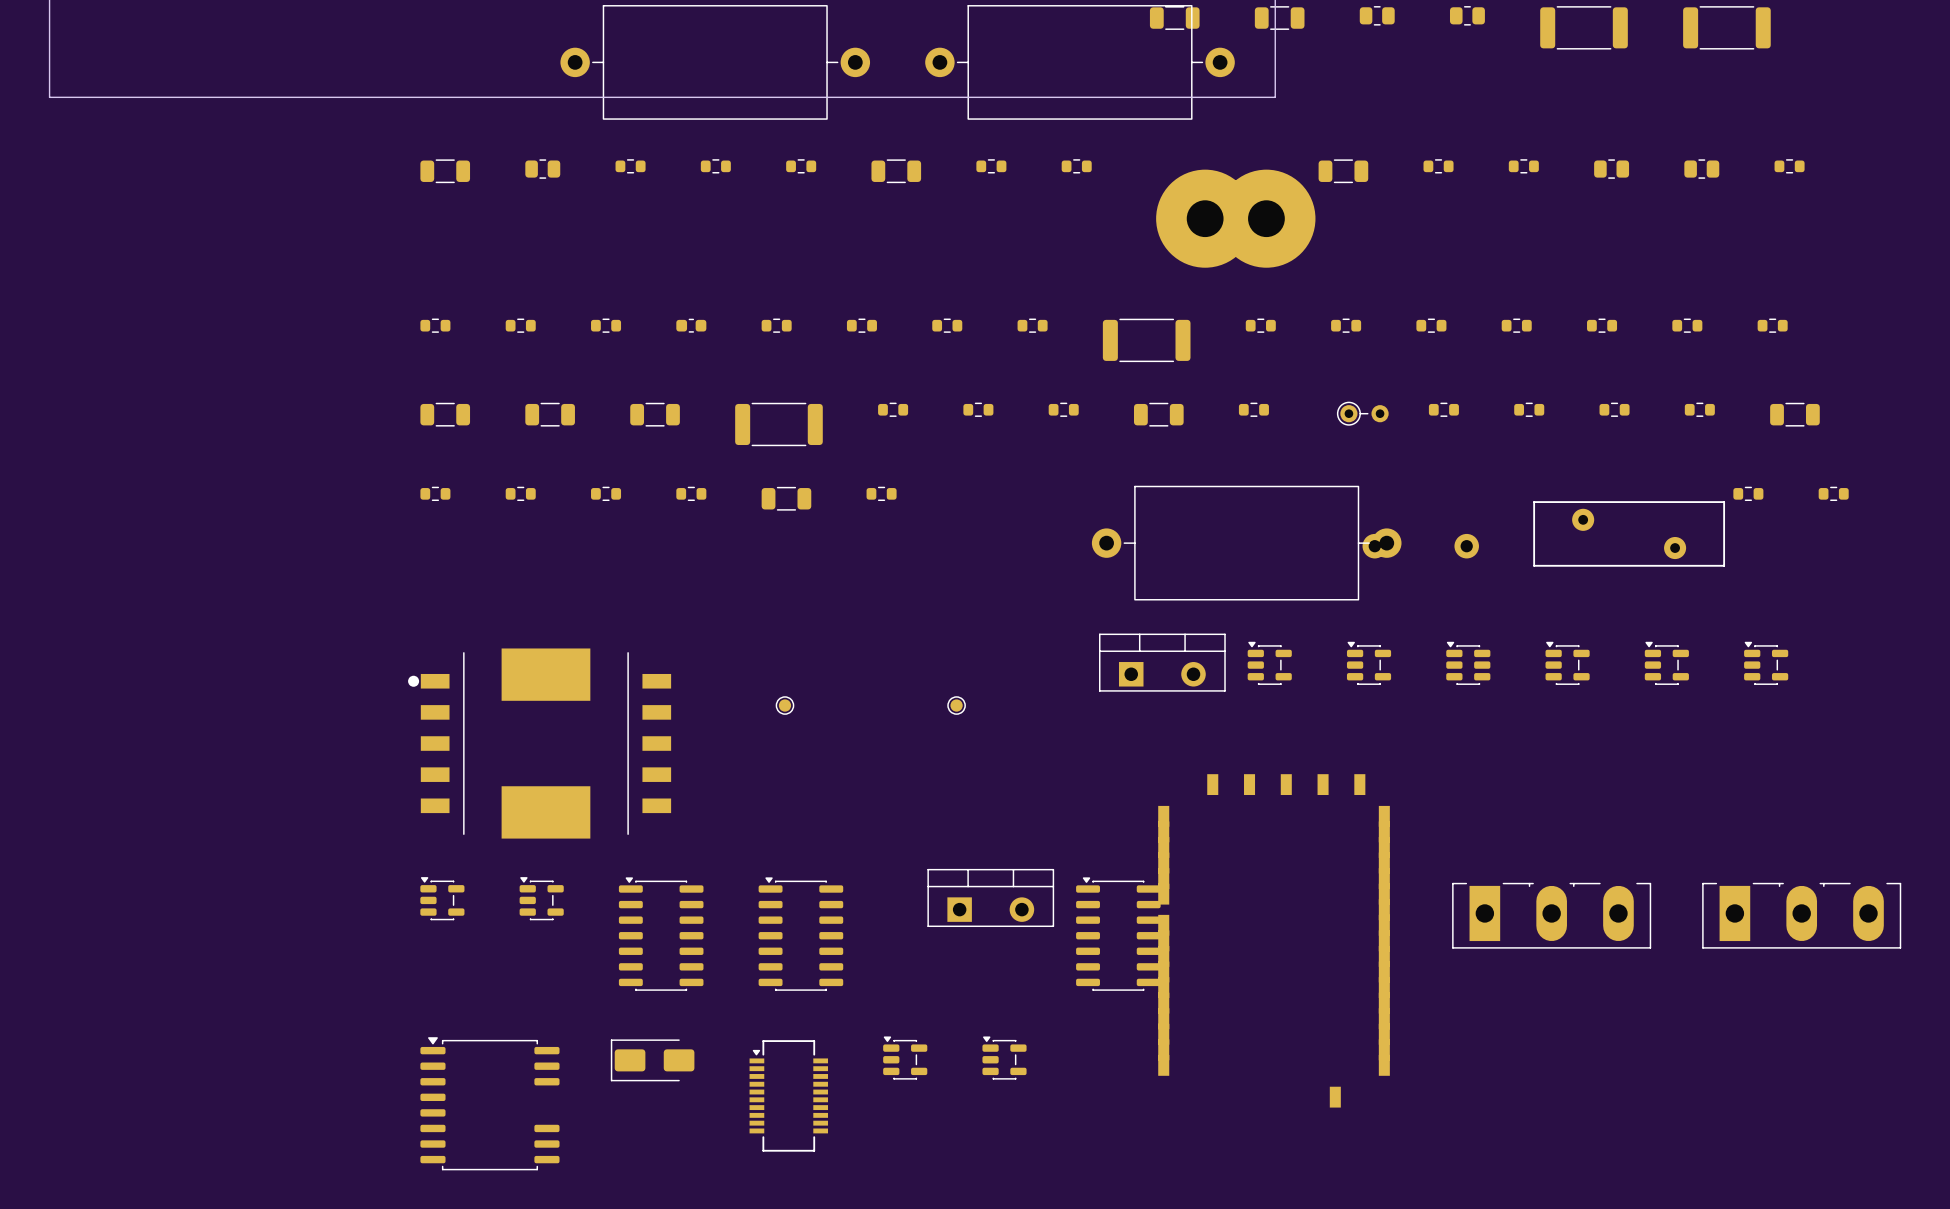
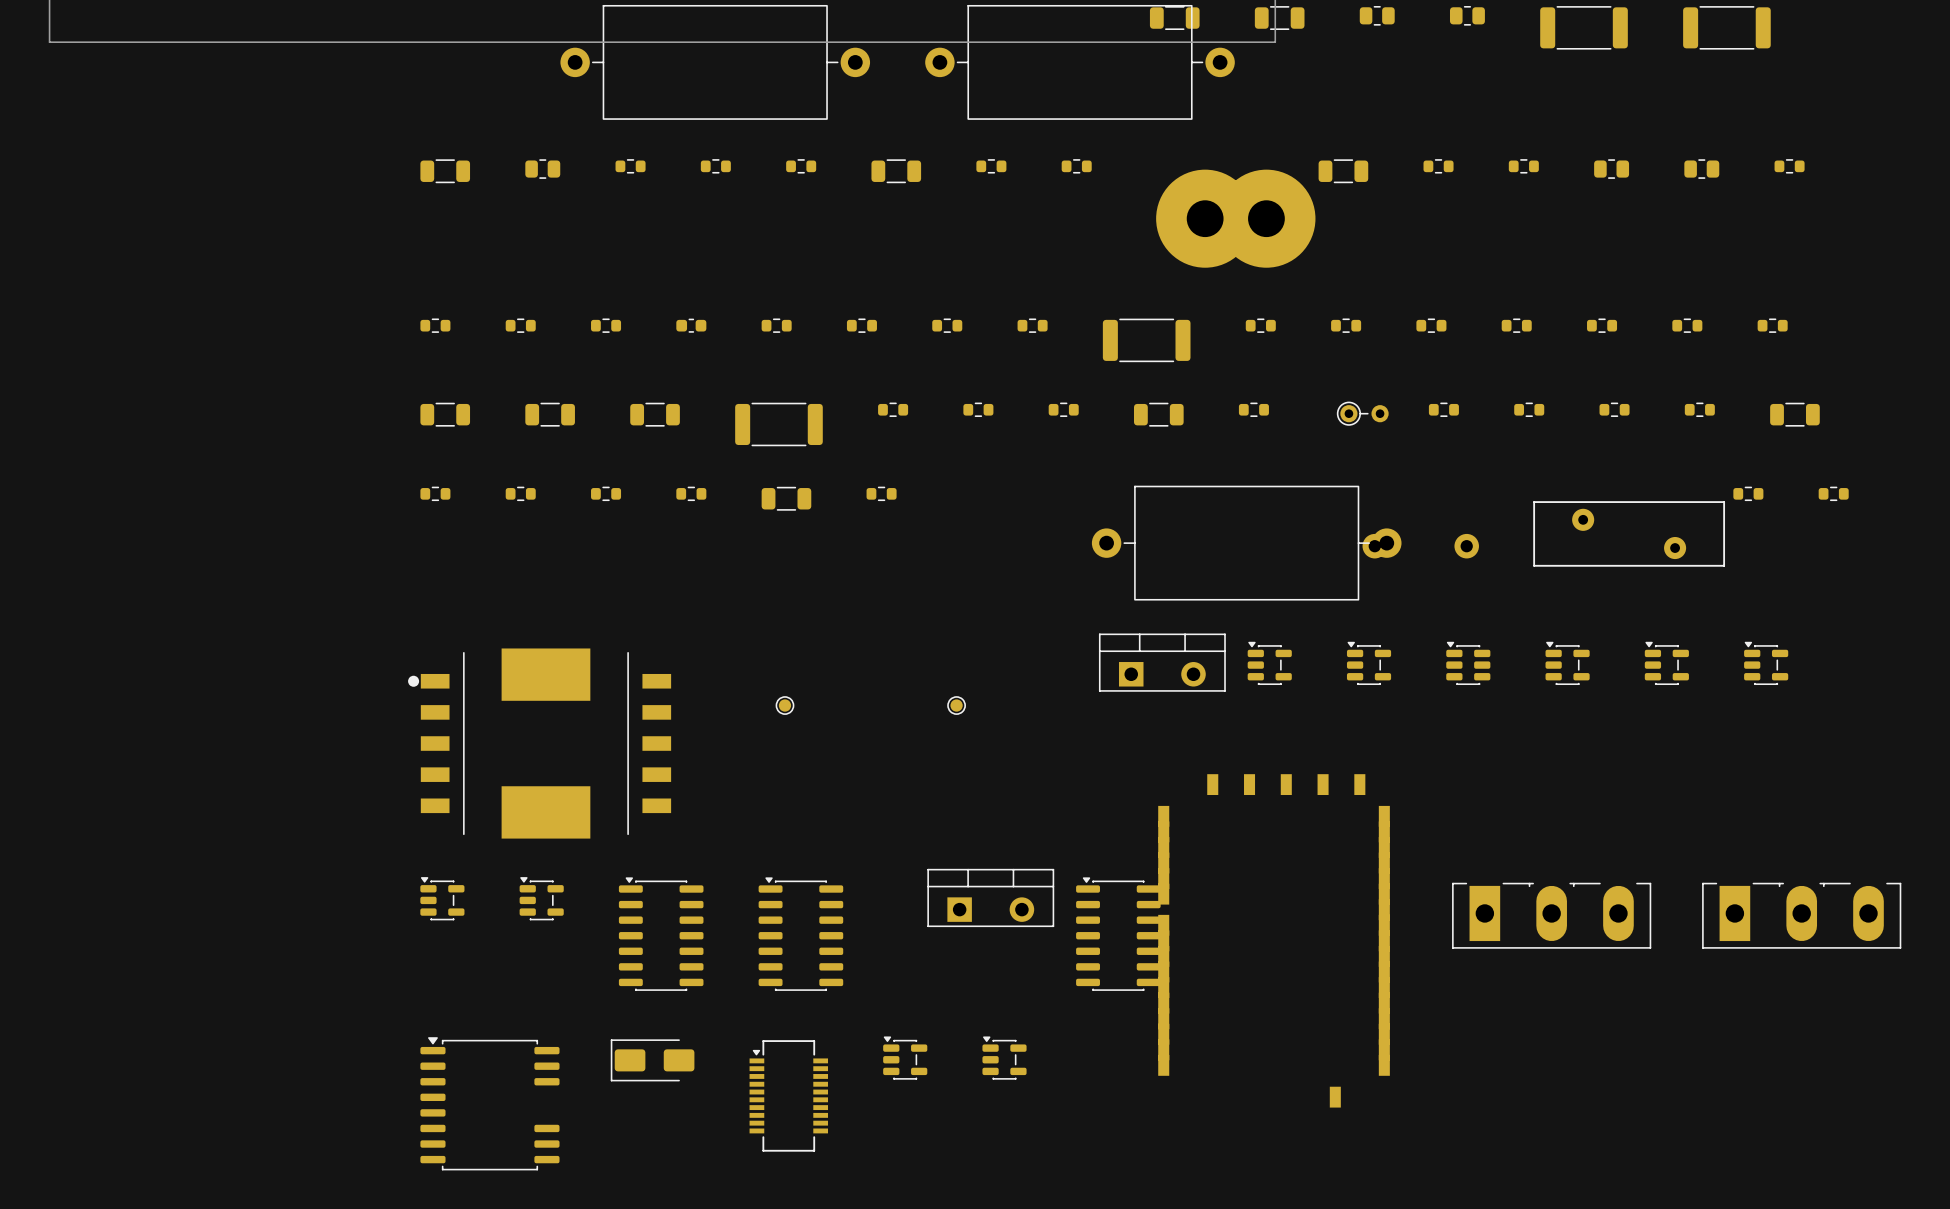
board edge: (49, 42) (49, 97) (1275, 97) (1275, 42) -> (49, 42) (1275, 42)

